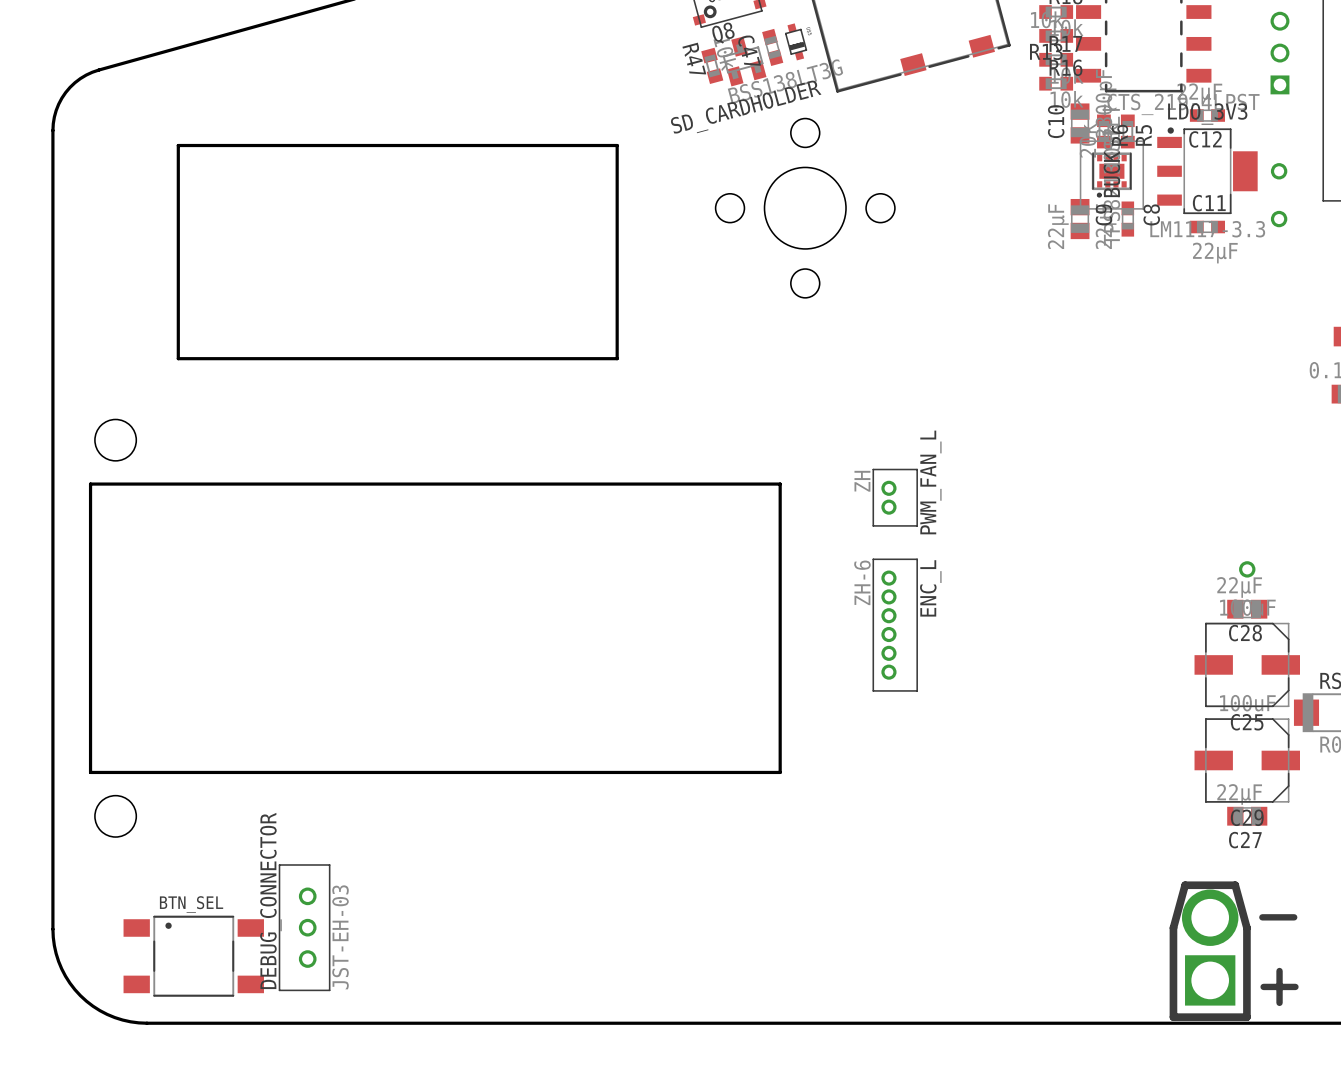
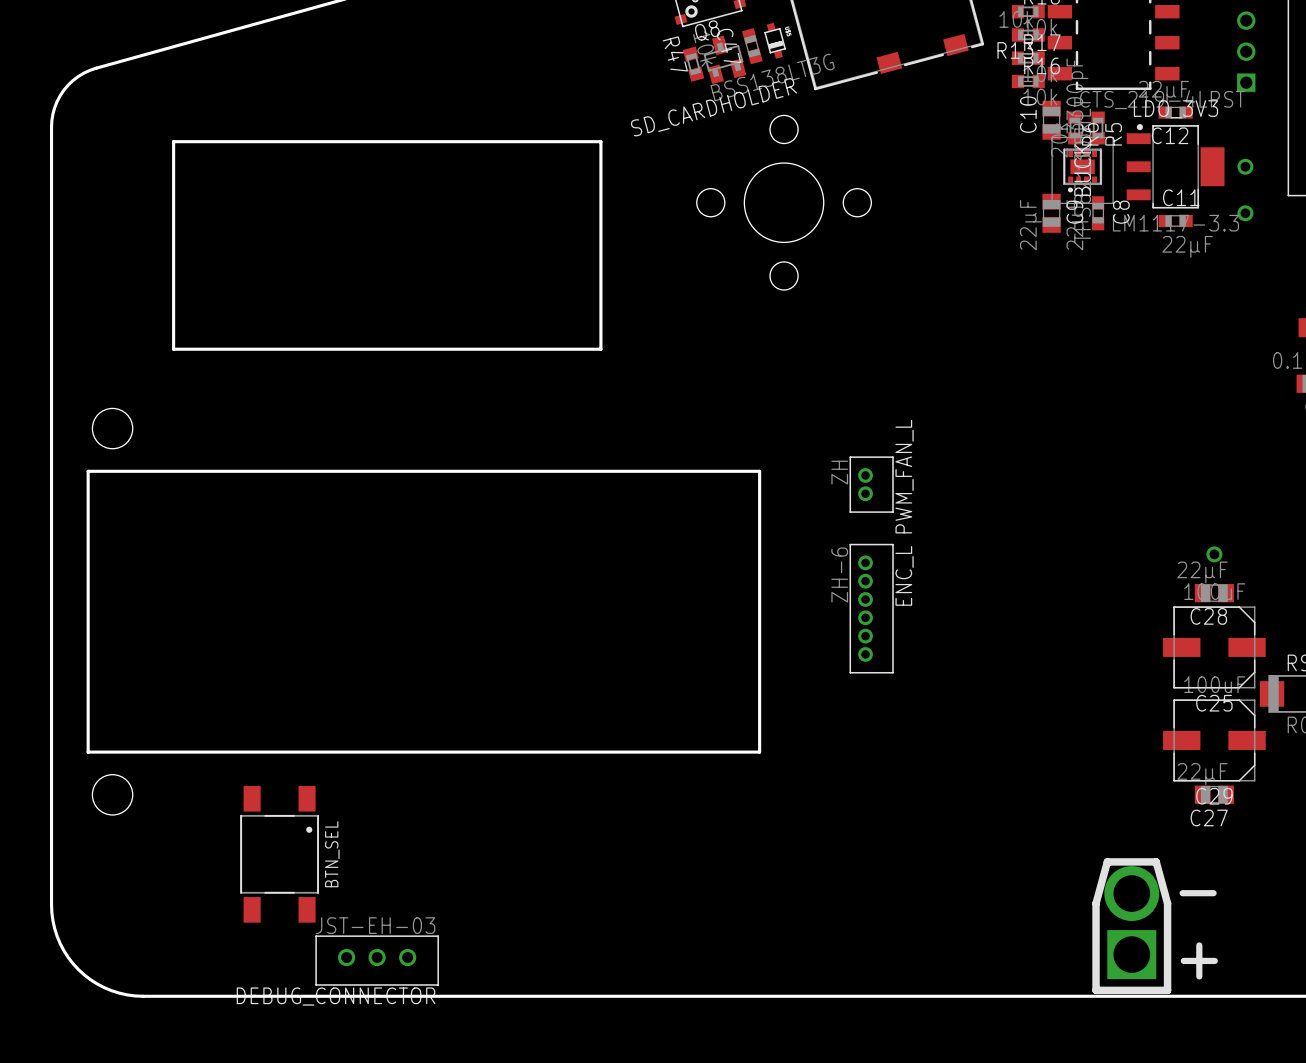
DEBUG_CONNECTOR rotation: 0° (304, 927) -> 90° counterclockwise (377, 960)
DEBUG_CONNECTOR position: (304, 927) -> (377, 960)
part position: (1234, 951) -> (1155, 926)
BTN_SEL rotation: 0° (193, 956) -> 90° clockwise (279, 854)
BTN_SEL position: (193, 956) -> (279, 854)

